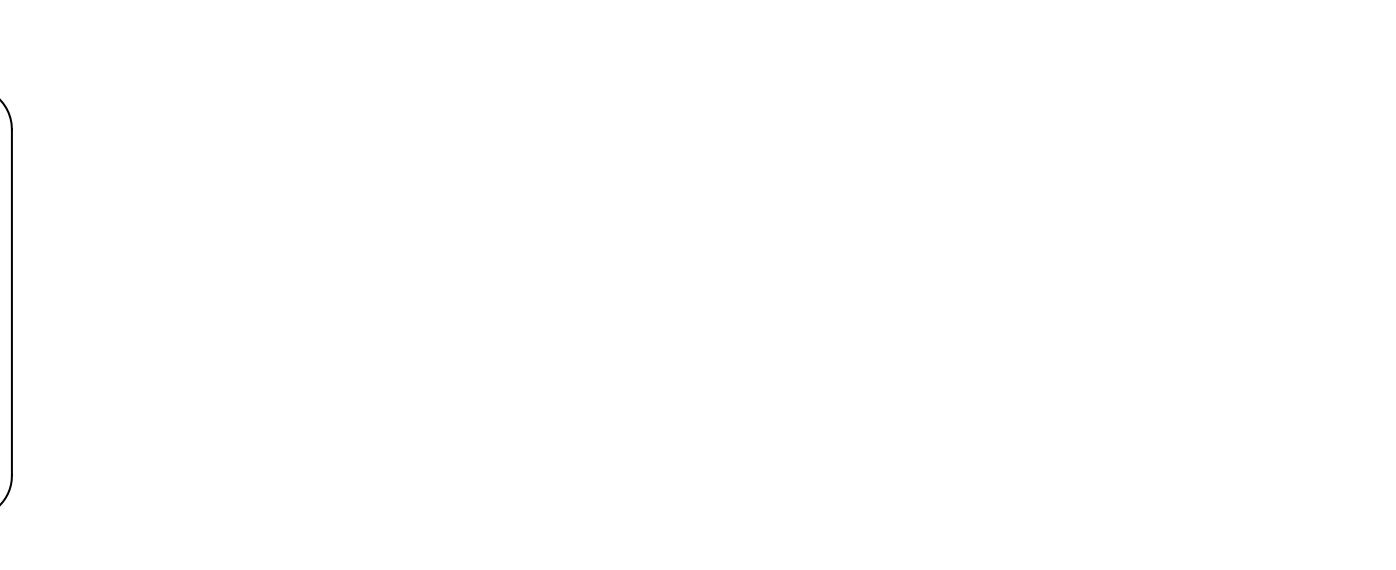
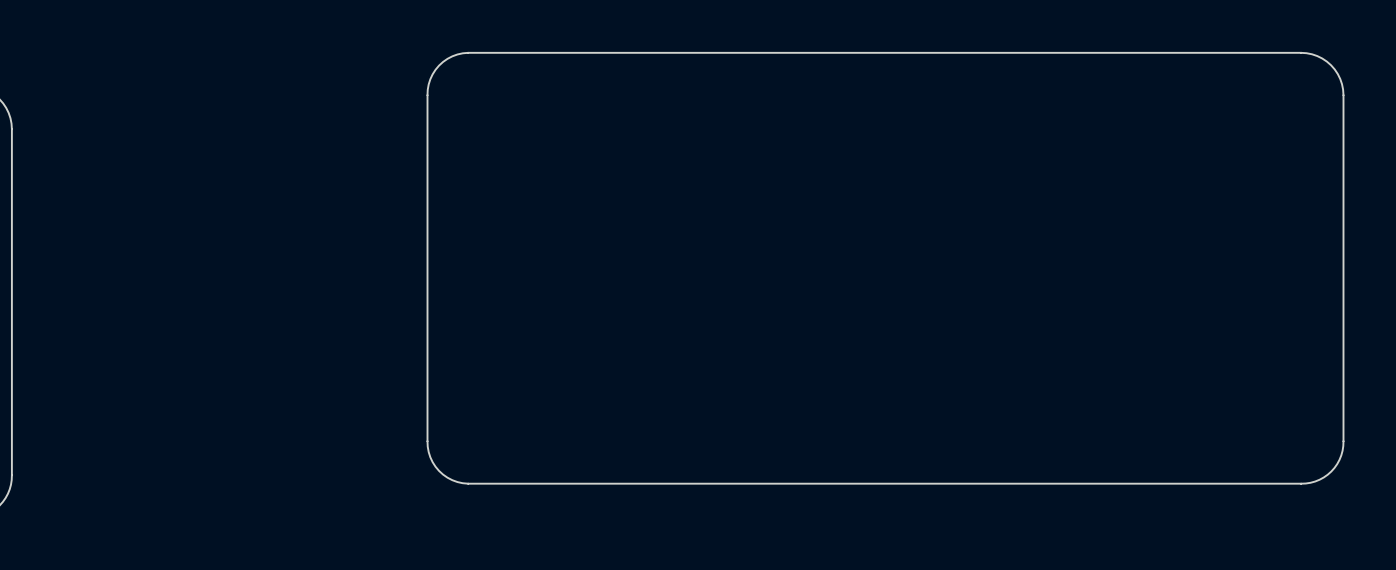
board edge: none -> (1301, 52) (468, 52) (452, 56) (435, 69) (427, 89) (427, 441) (430, 457) (443, 474) (452, 480) (468, 483) (1301, 483) (1319, 479) (1327, 474) (1337, 464) (1343, 446) (1343, 95) (1340, 79) (1331, 65) (1317, 56) (1301, 52)

